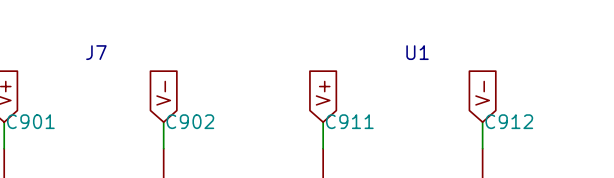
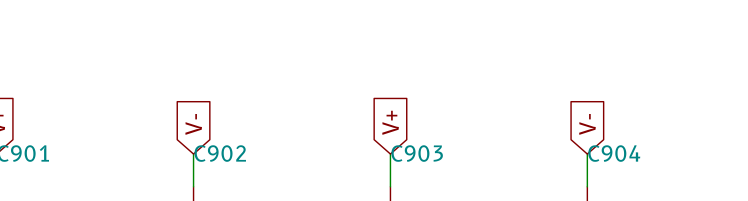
text: J7 (96, 52) -> none
text: U1 (417, 52) -> none
C911 name: C911 (349, 121) -> C903 (417, 153)
C912 name: C912 (509, 121) -> C904 (614, 153)

